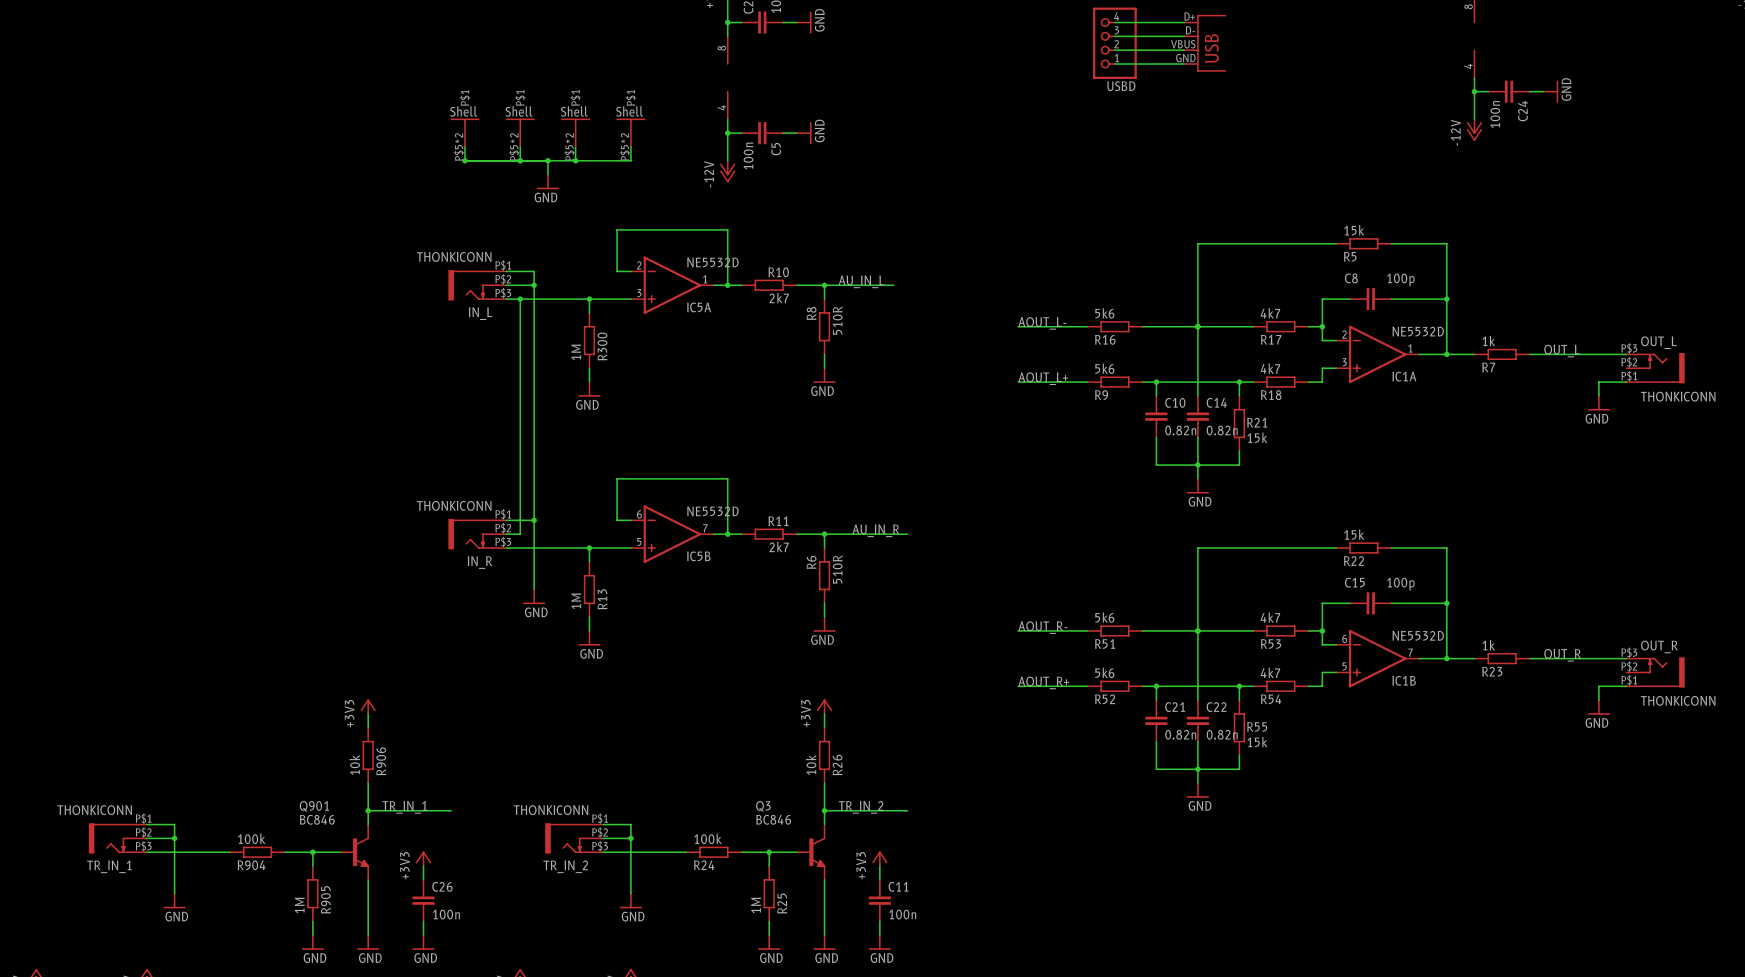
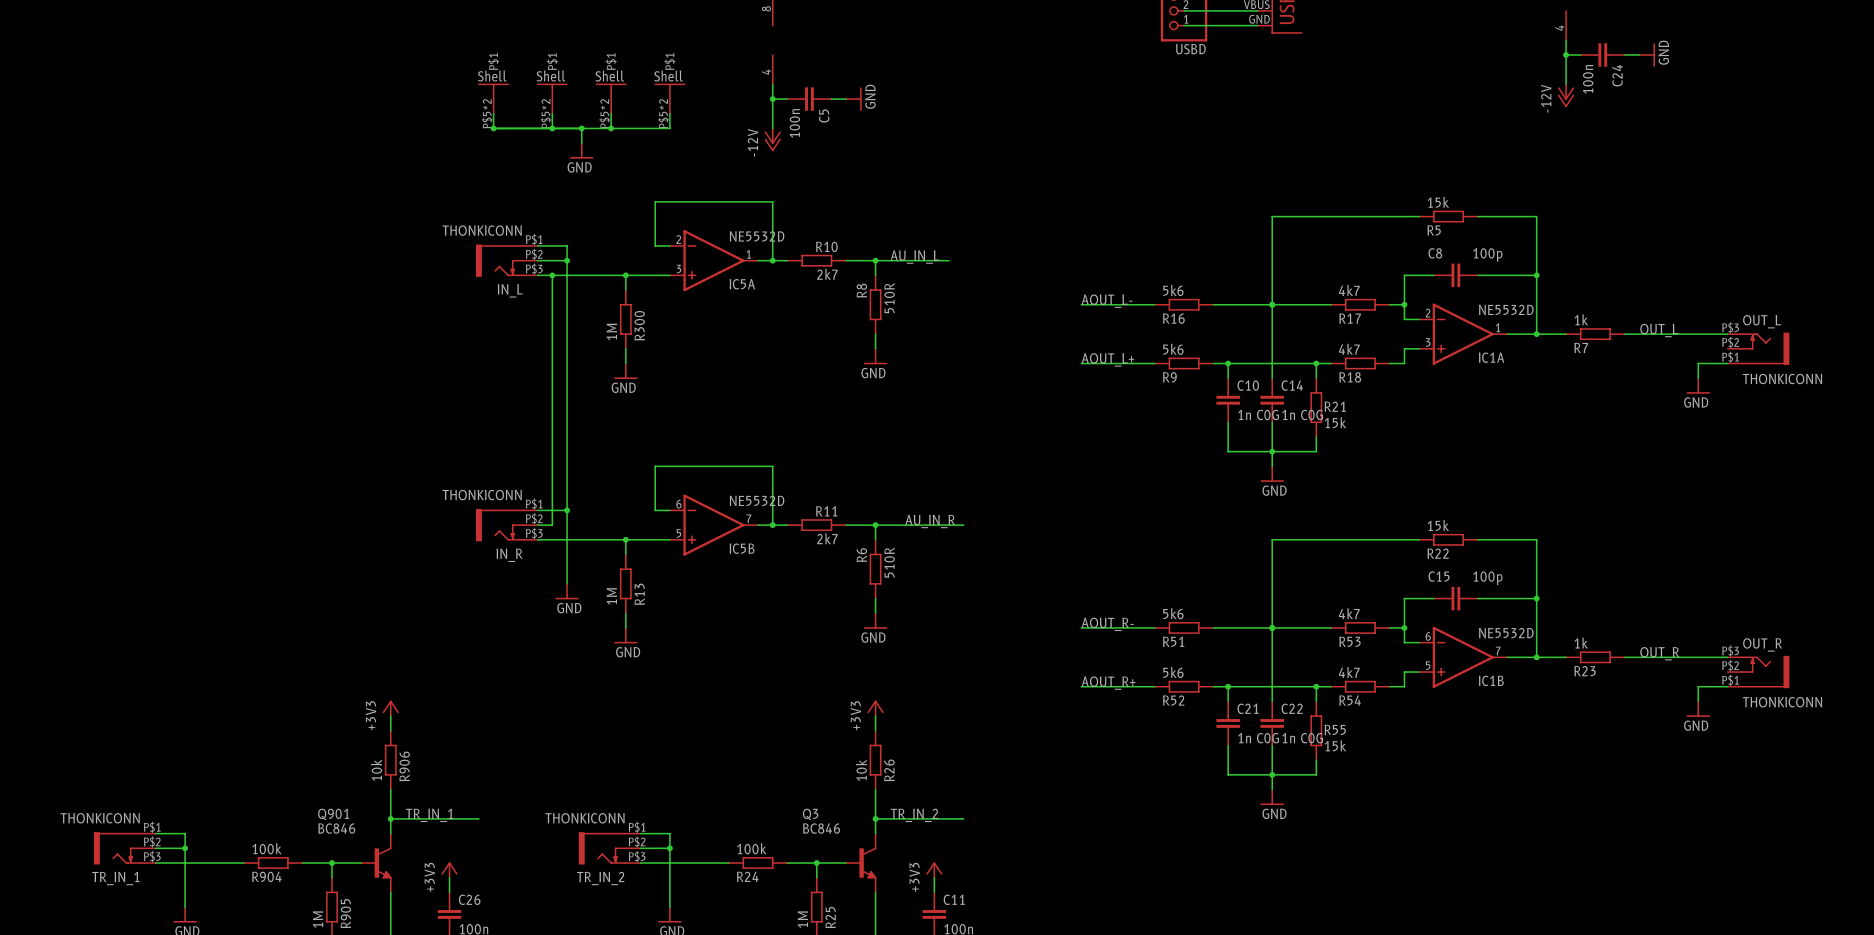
C10 value: 0.82n (1180, 430) -> 1n C0G (1258, 414)
C14 value: 0.82n (1222, 430) -> 1n C0G (1302, 414)
C21 value: 0.82n (1180, 734) -> 1n C0G (1258, 738)
C22 value: 0.82n (1222, 734) -> 1n C0G (1302, 738)

